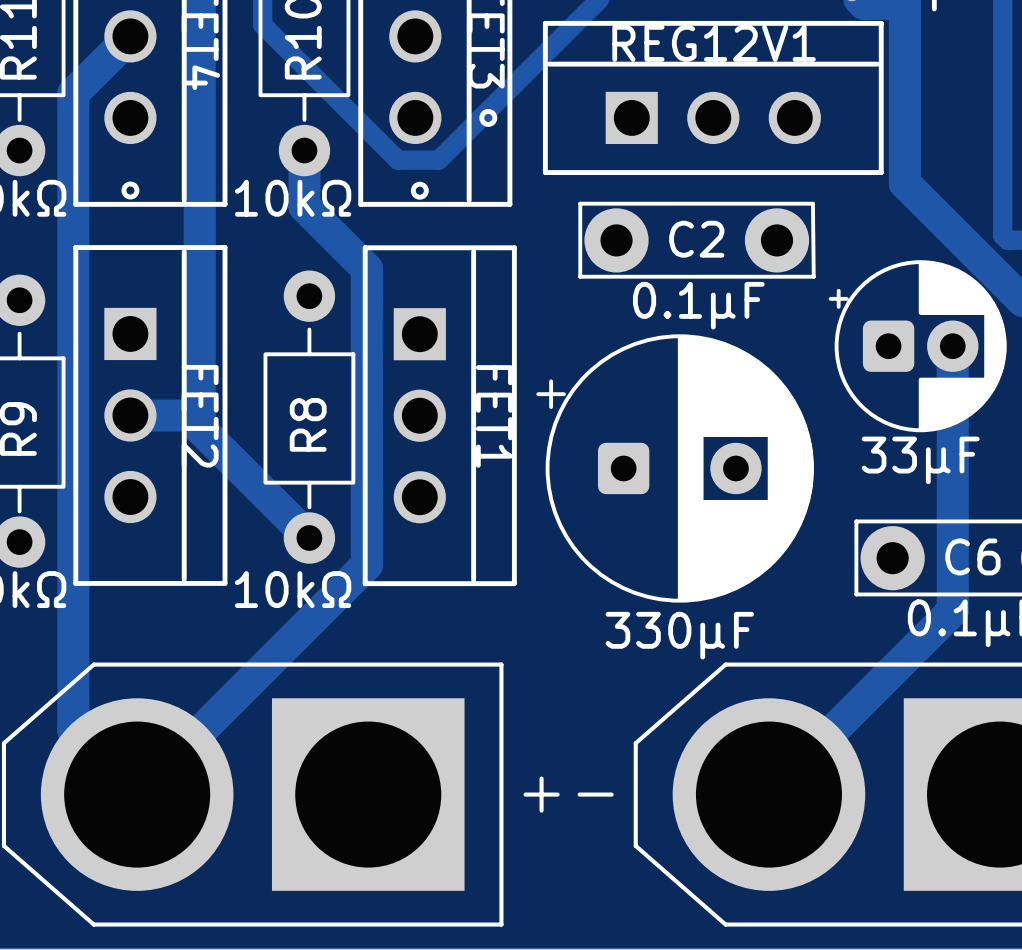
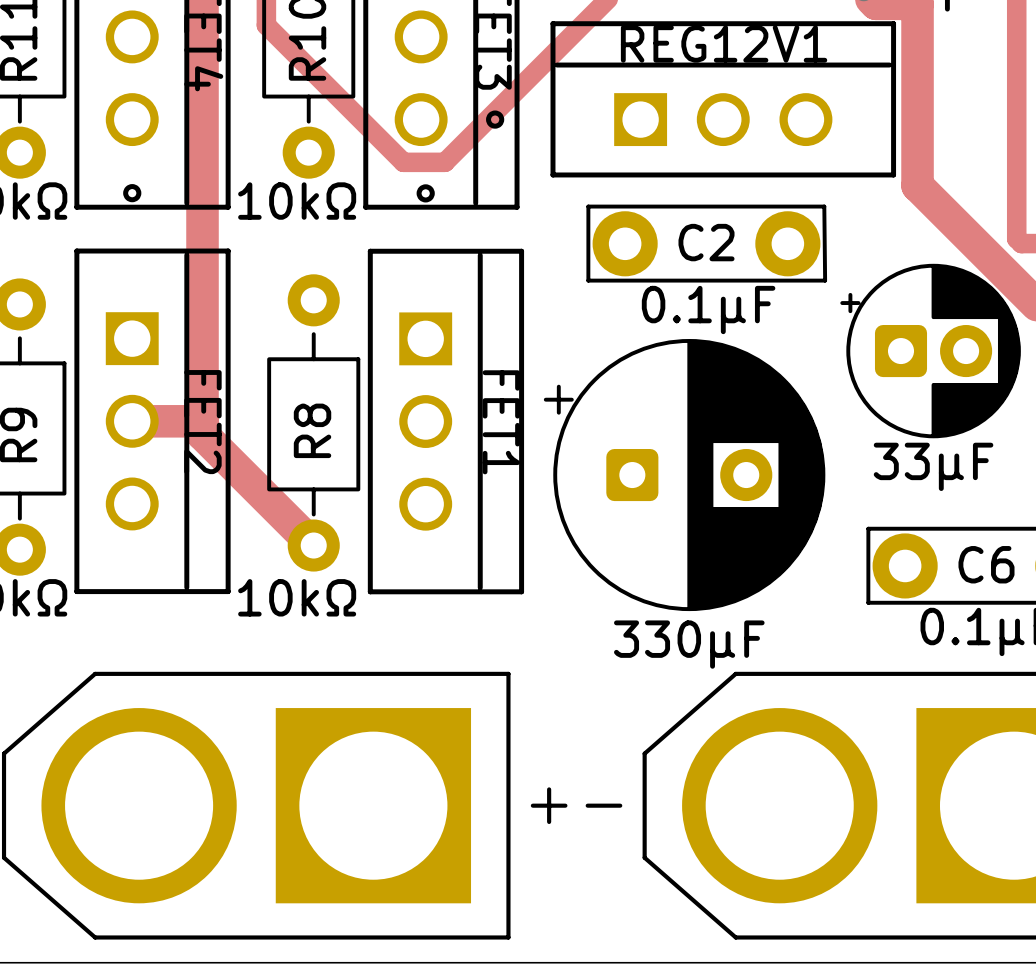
track: (130, 36) (73, 93) (73, 730) (137, 794) (366, 564) (366, 268) (304, 206) (304, 150) -> none
track: (952, 346) (952, 610) (768, 794) -> none

